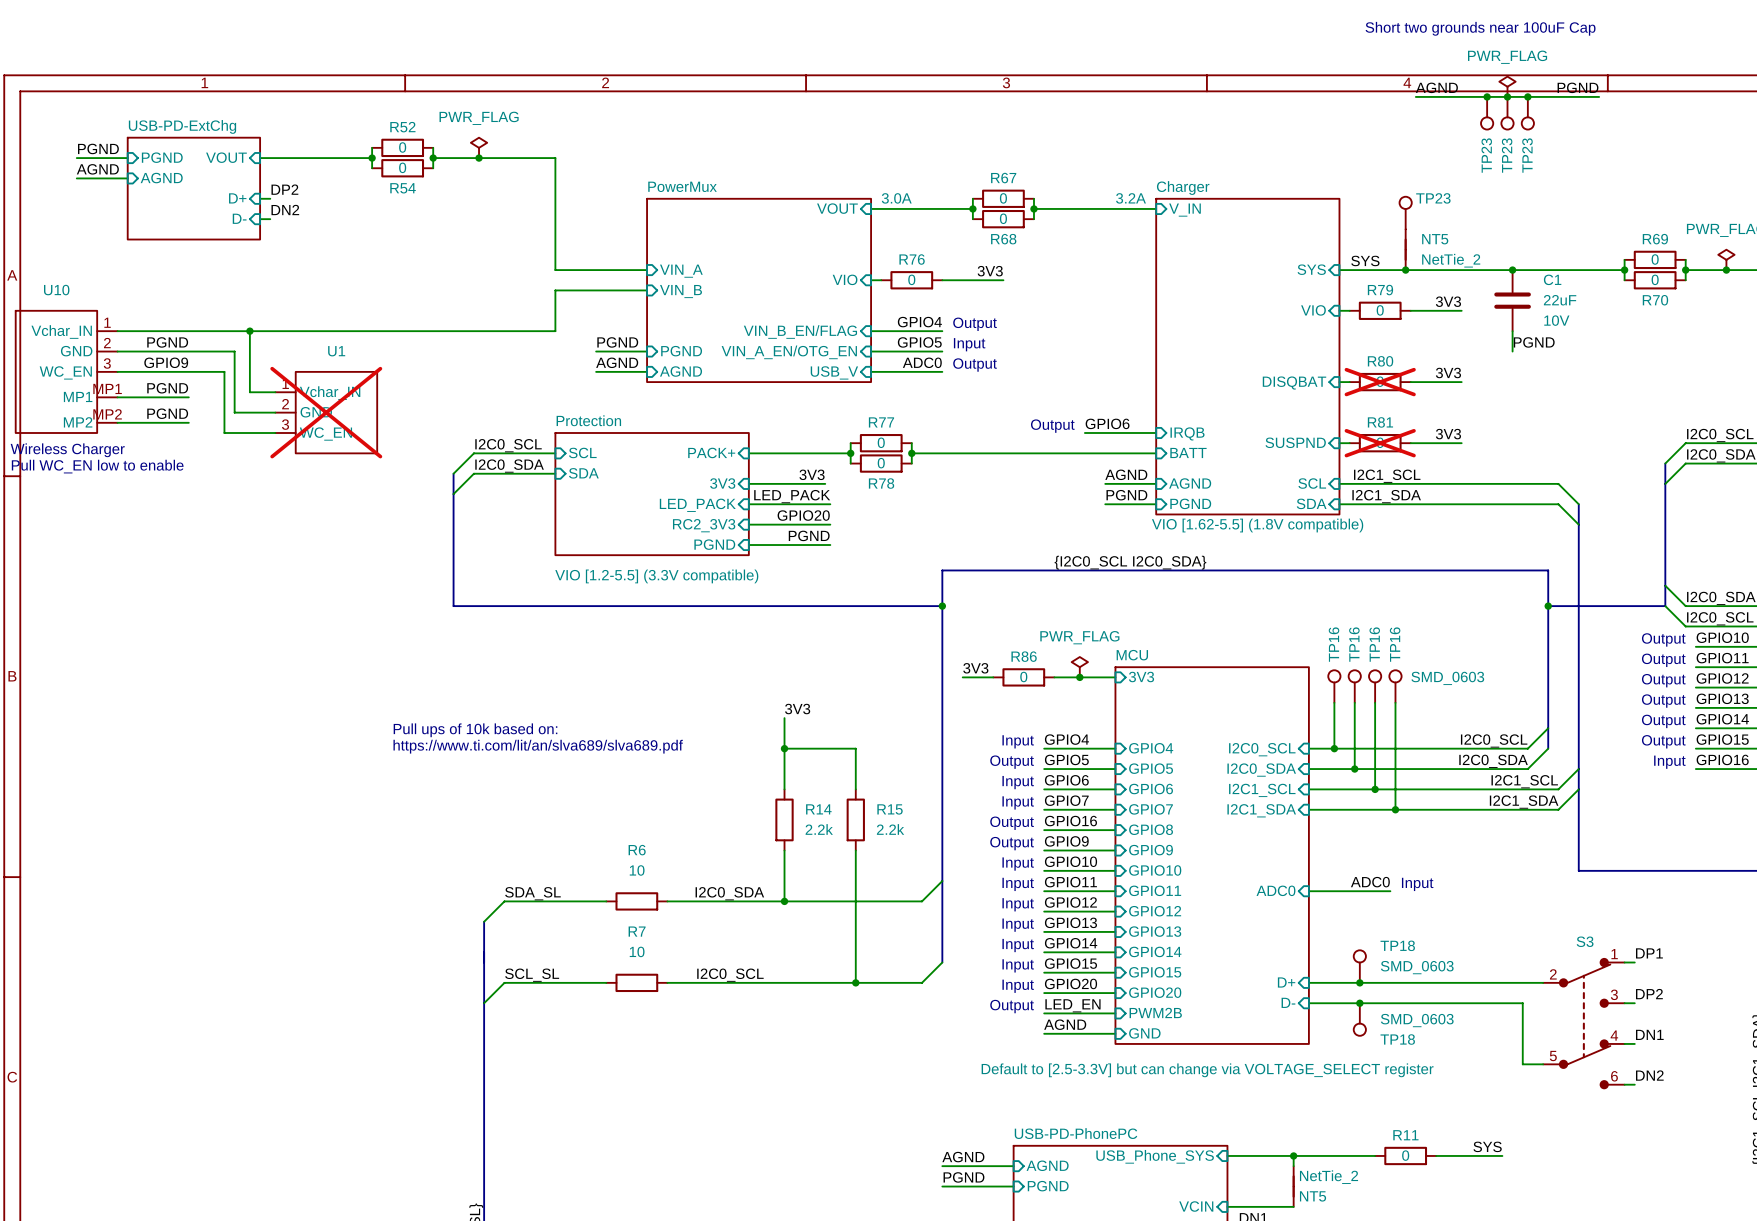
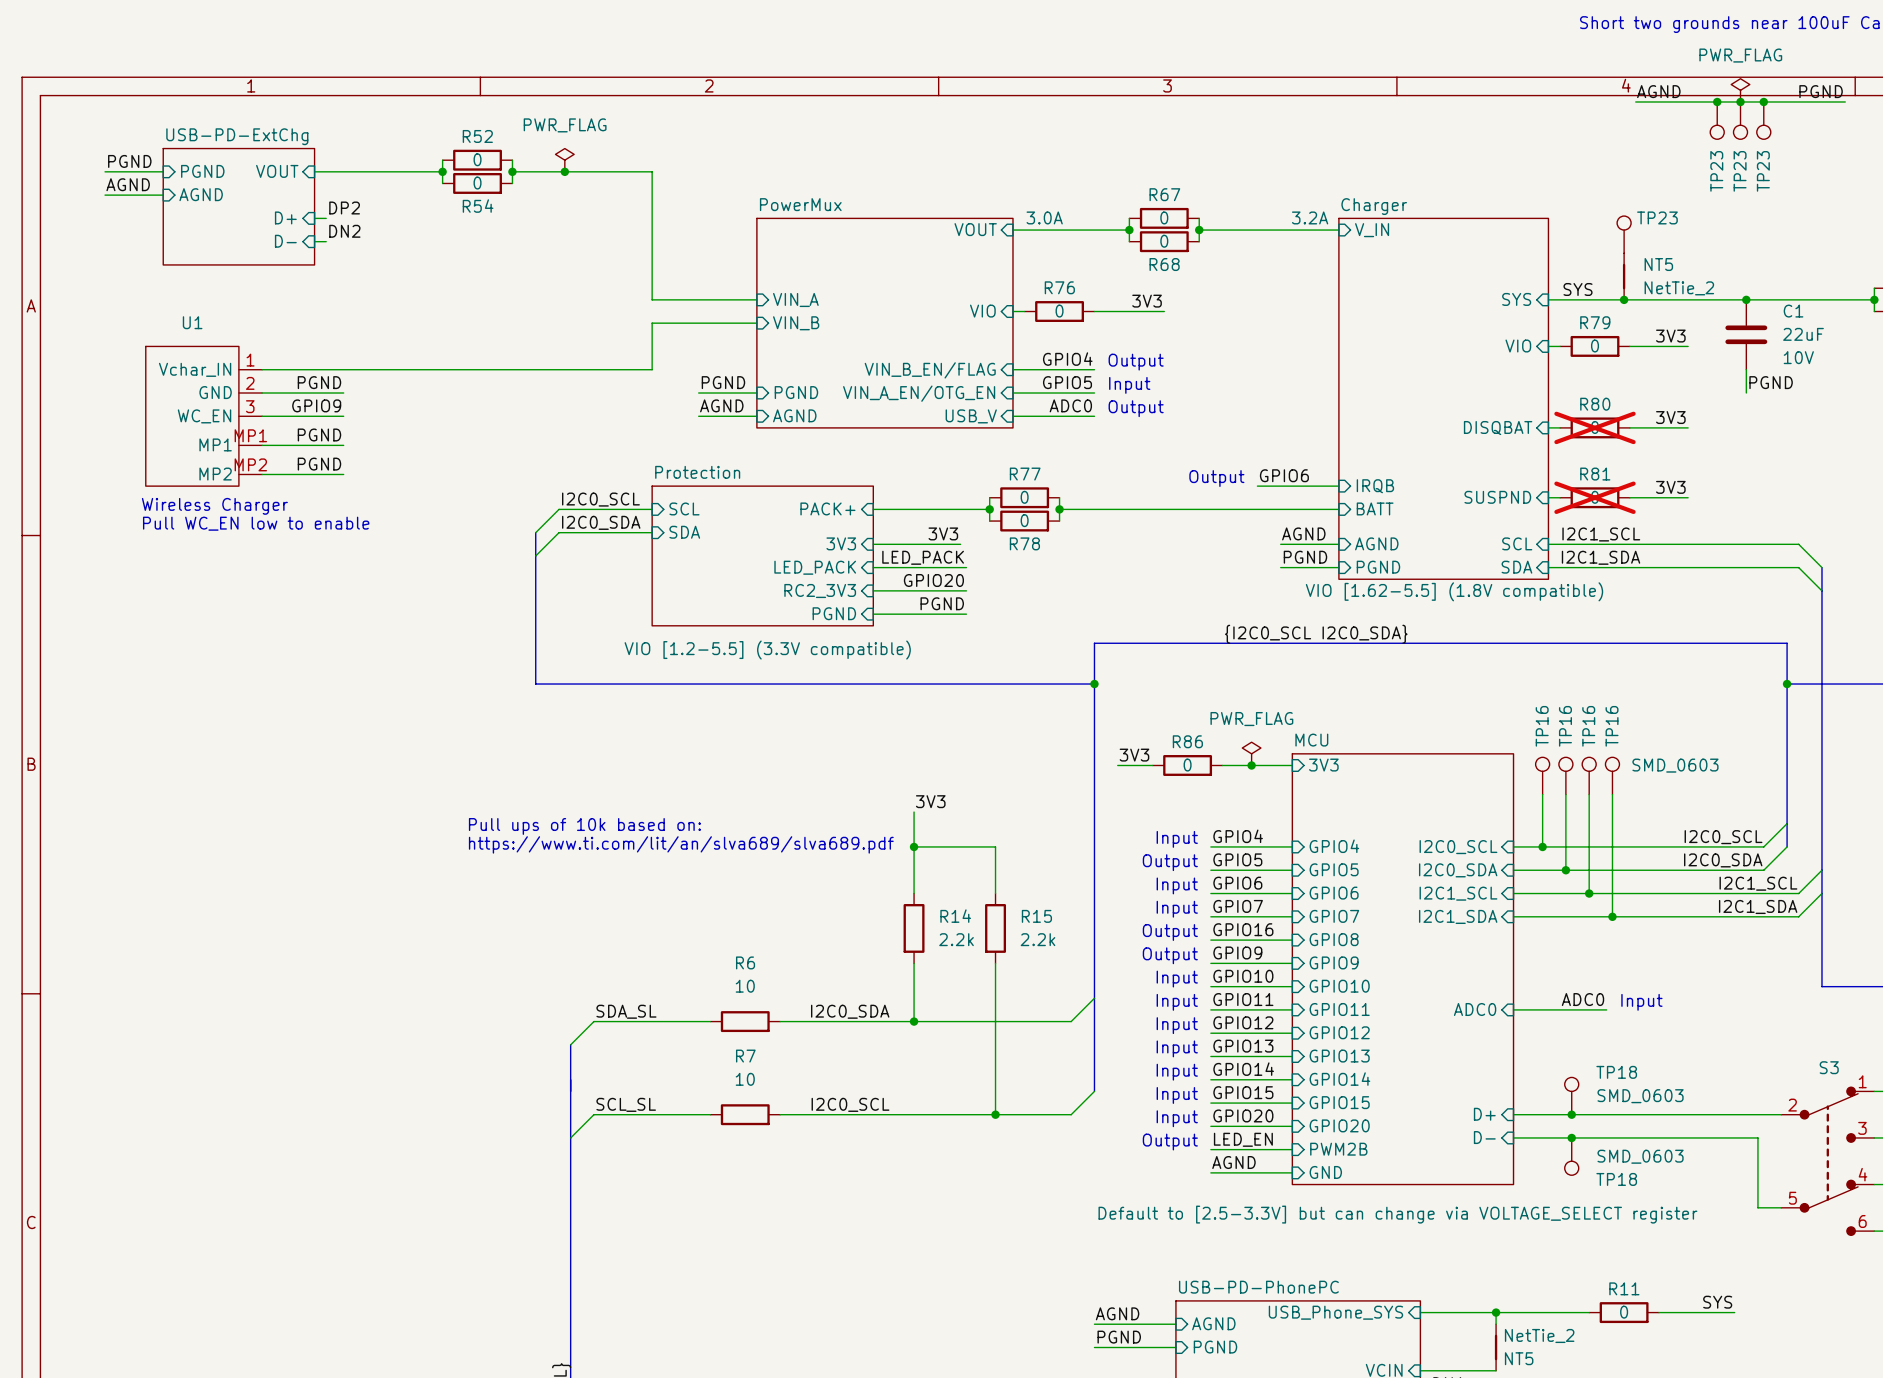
wire: (117, 331) (214, 331) -> none
wire: (249, 331) (249, 392) (275, 392) -> none
junction: (249, 331) -> none
label: PGND (167, 342) -> none
label: none -> PGND (319, 382)
wire: (117, 351) (214, 351) -> none
wire: (234, 351) (234, 412) (275, 412) -> (285, 393) (343, 393)
U1 name position: U1 (336, 351) -> U1 (192, 322)
label position: GPIO9 (166, 362) -> GPIO9 (316, 405)
U10: (66, 371) -> none
wire: (117, 371) (214, 371) -> none
wire: (224, 371) (224, 432) (275, 432) -> (273, 416) (343, 416)
U1 symbol: [275, 371, 378, 454] -> [145, 346, 263, 487]
label: PGND (167, 388) -> none
label: none -> PGND (319, 434)
wire: (117, 397) (188, 397) -> (262, 445) (343, 445)
U1 do-not-place cross: (326, 412) -> none
label: PGND (167, 413) -> none
label: none -> PGND (319, 464)
wire: (117, 422) (188, 422) -> (262, 474) (343, 474)
text position: Wireless Charger (67, 450) -> Wireless Charger (214, 506)
text position: Pull WC_EN low to enable (97, 466) -> Pull WC_EN low to enable (256, 523)

